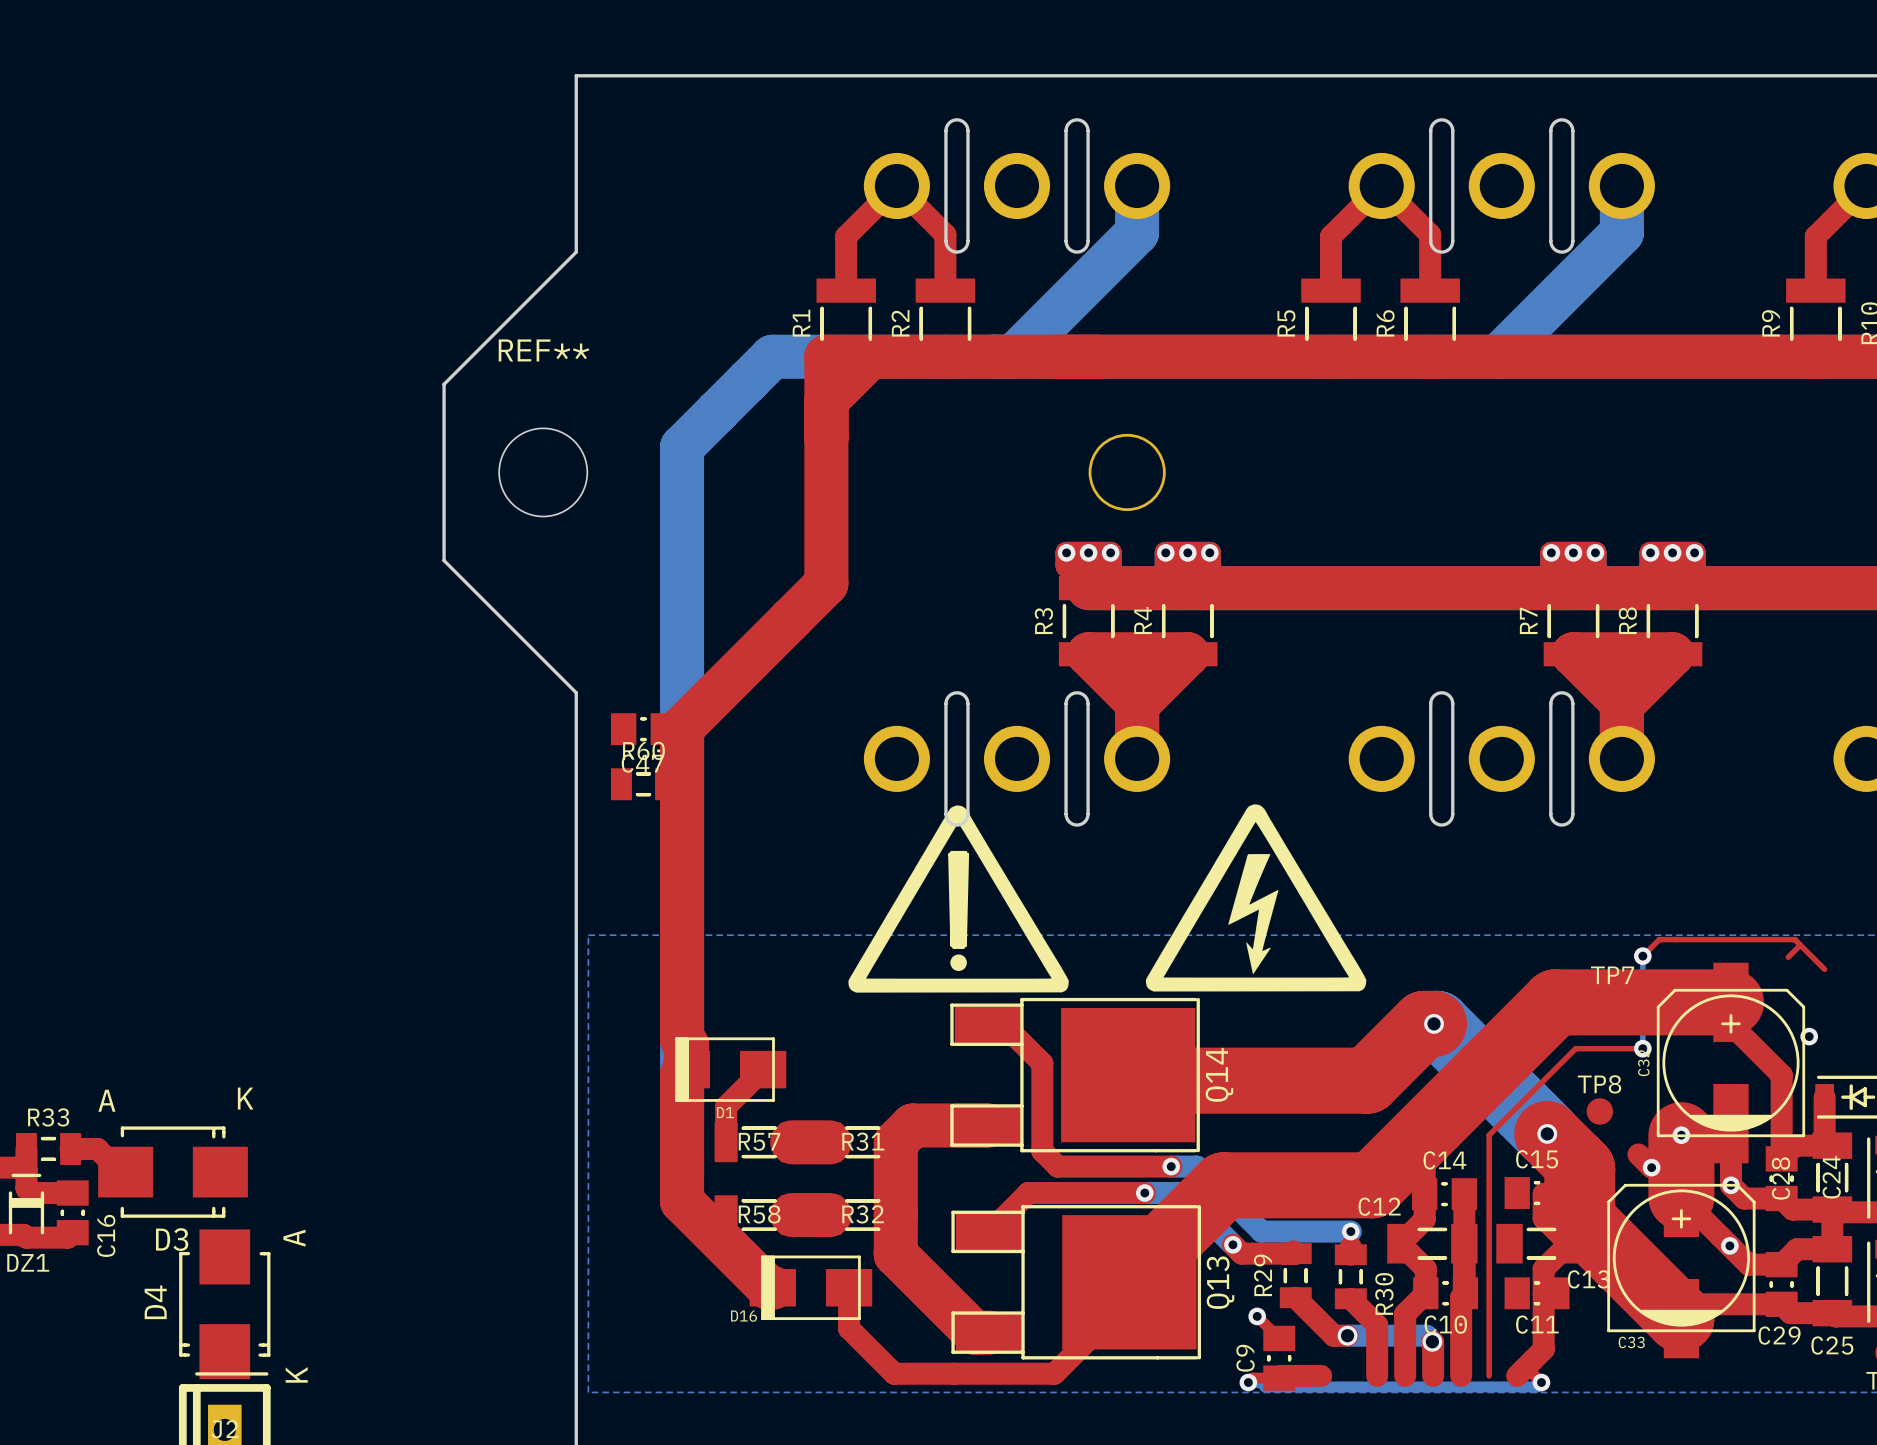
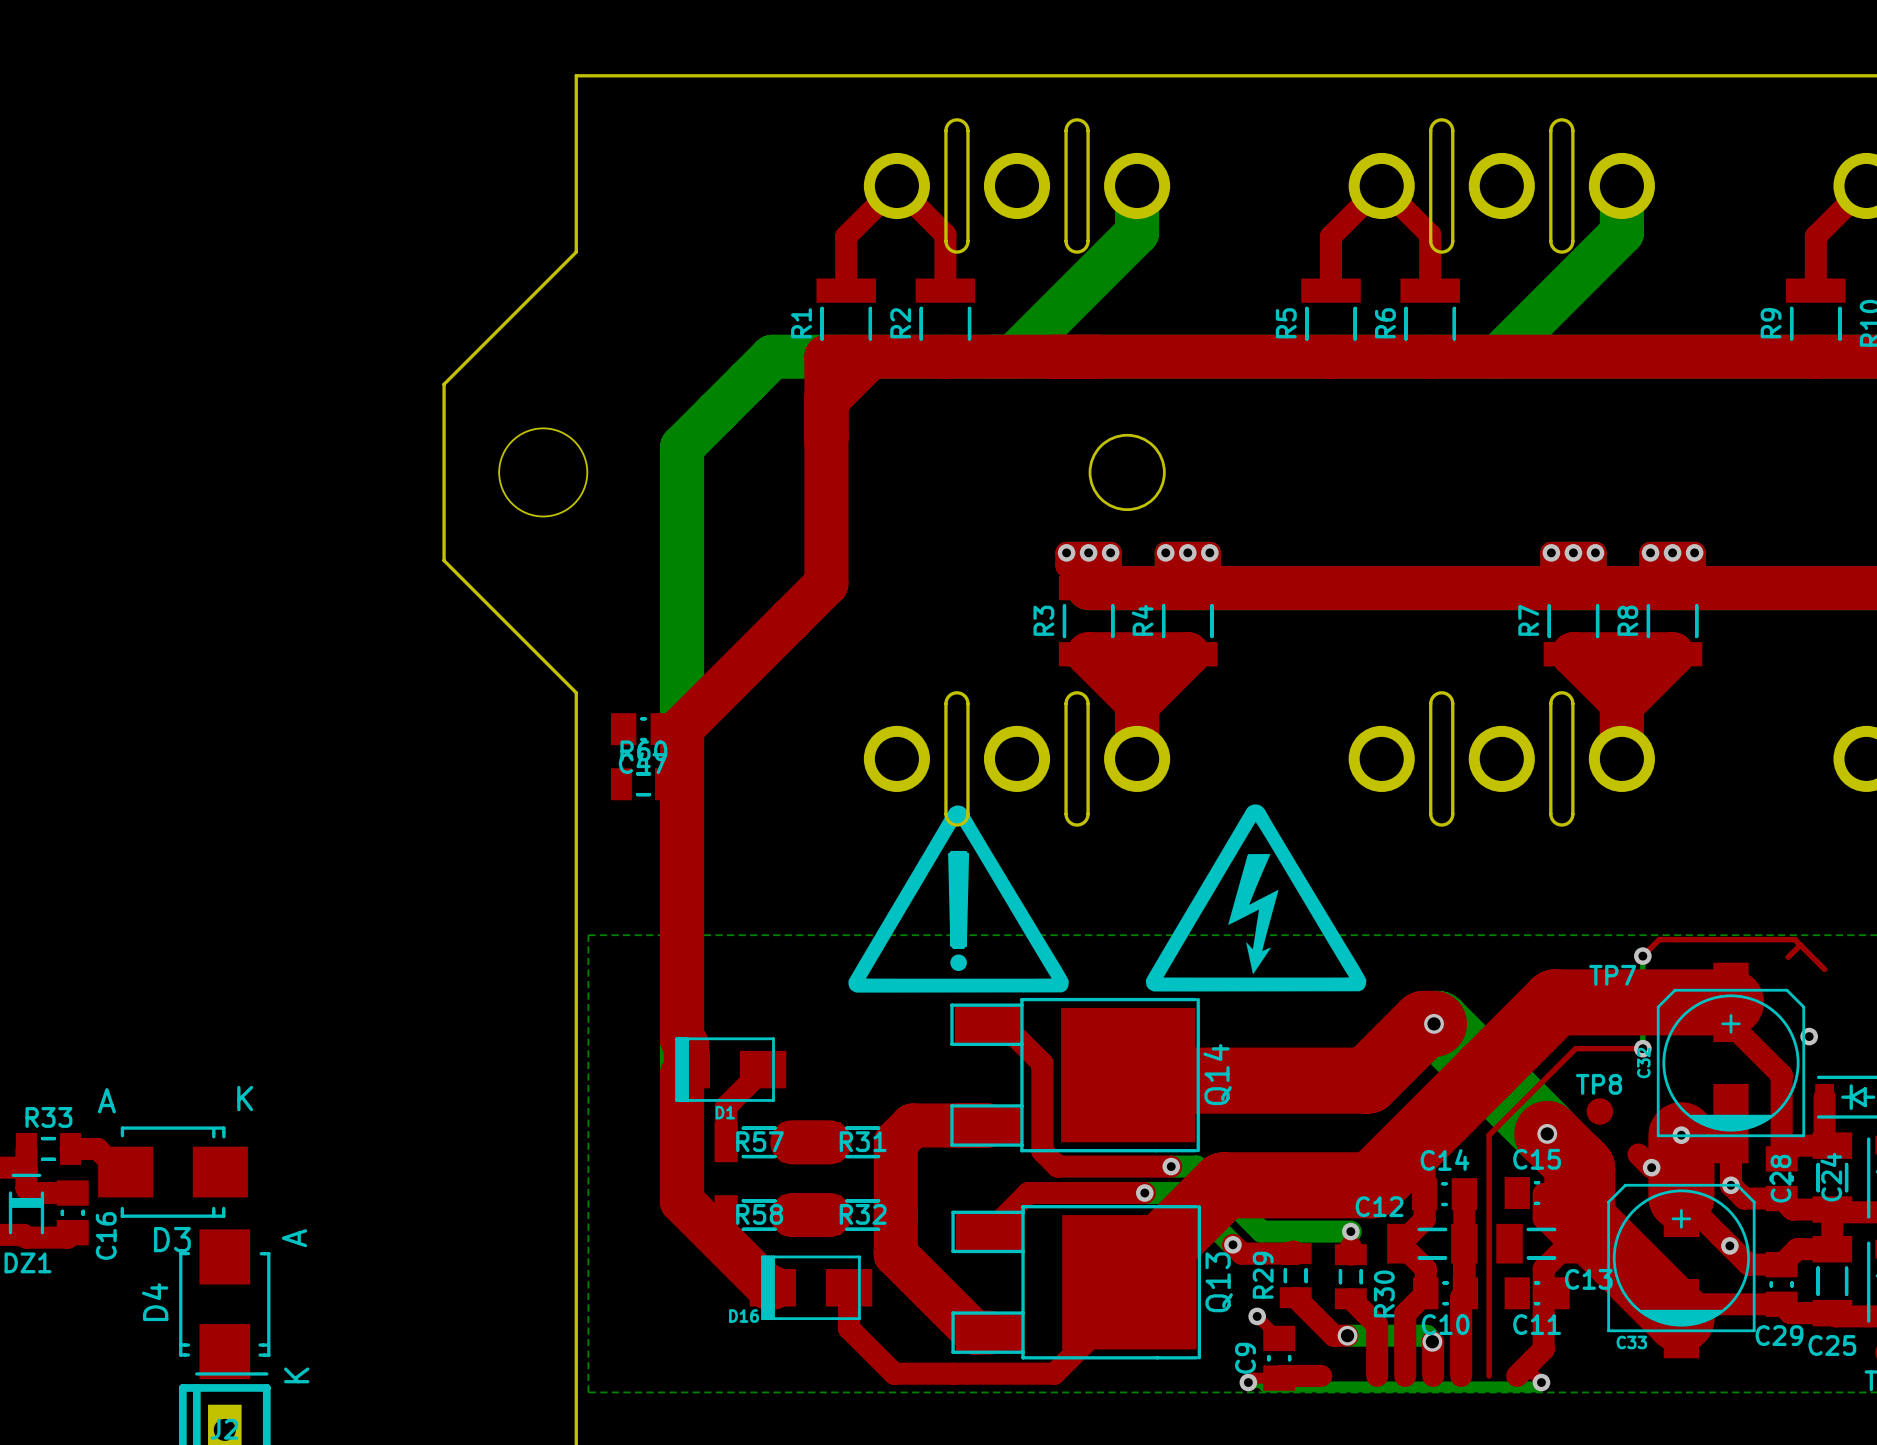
REF** name: REF** (543, 350) -> none

